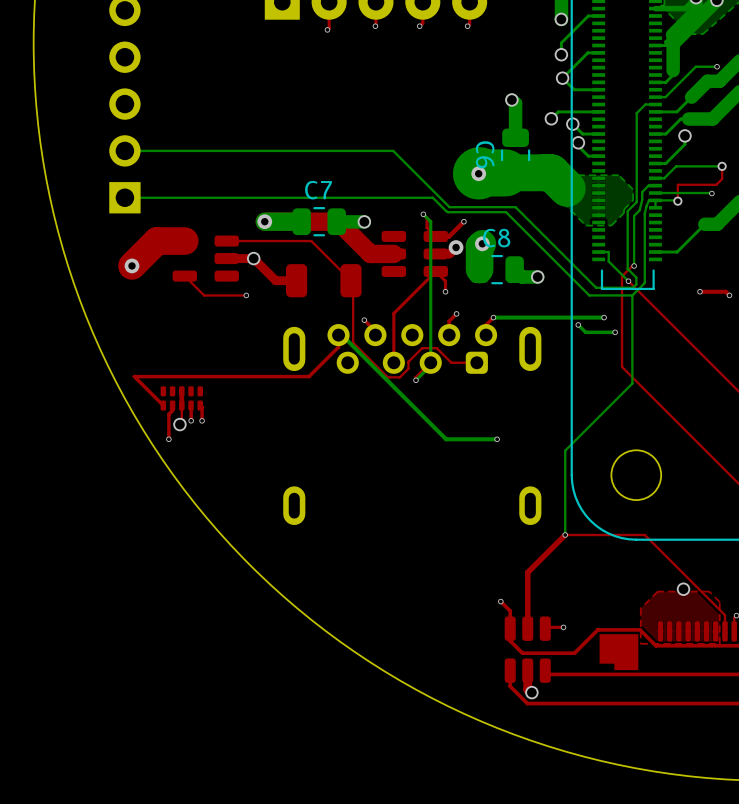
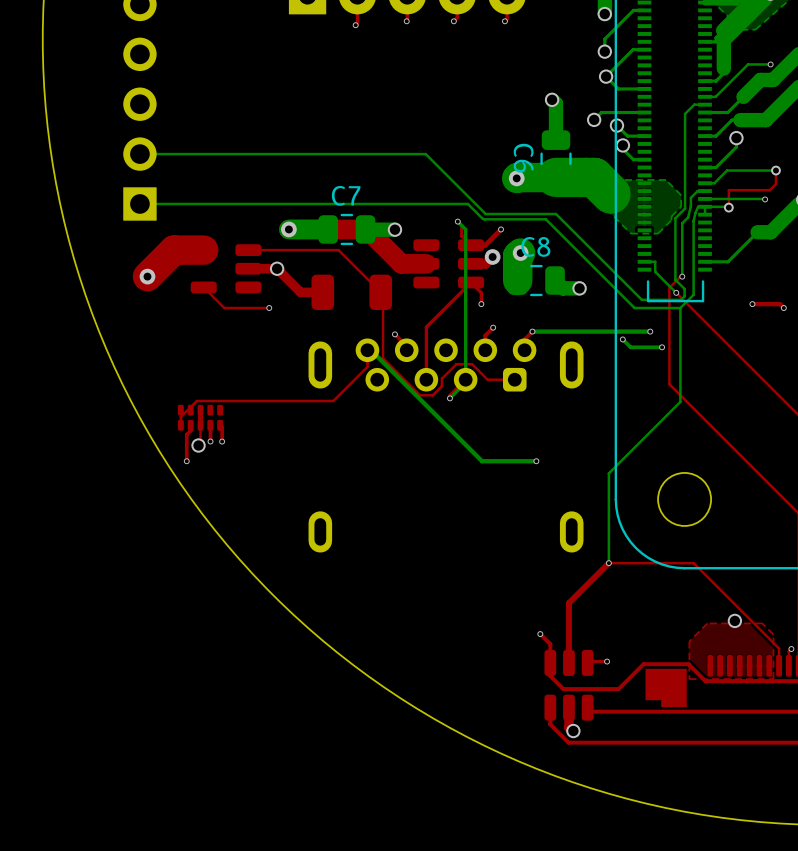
bottom track width: thick (505, 172) (478, 173) -> thin (545, 177) (516, 178)
top track: (338, 347) (309, 376) (134, 376) (163, 405) -> (367, 363) (367, 366) (333, 401) (196, 401) (180, 416) (180, 425)

